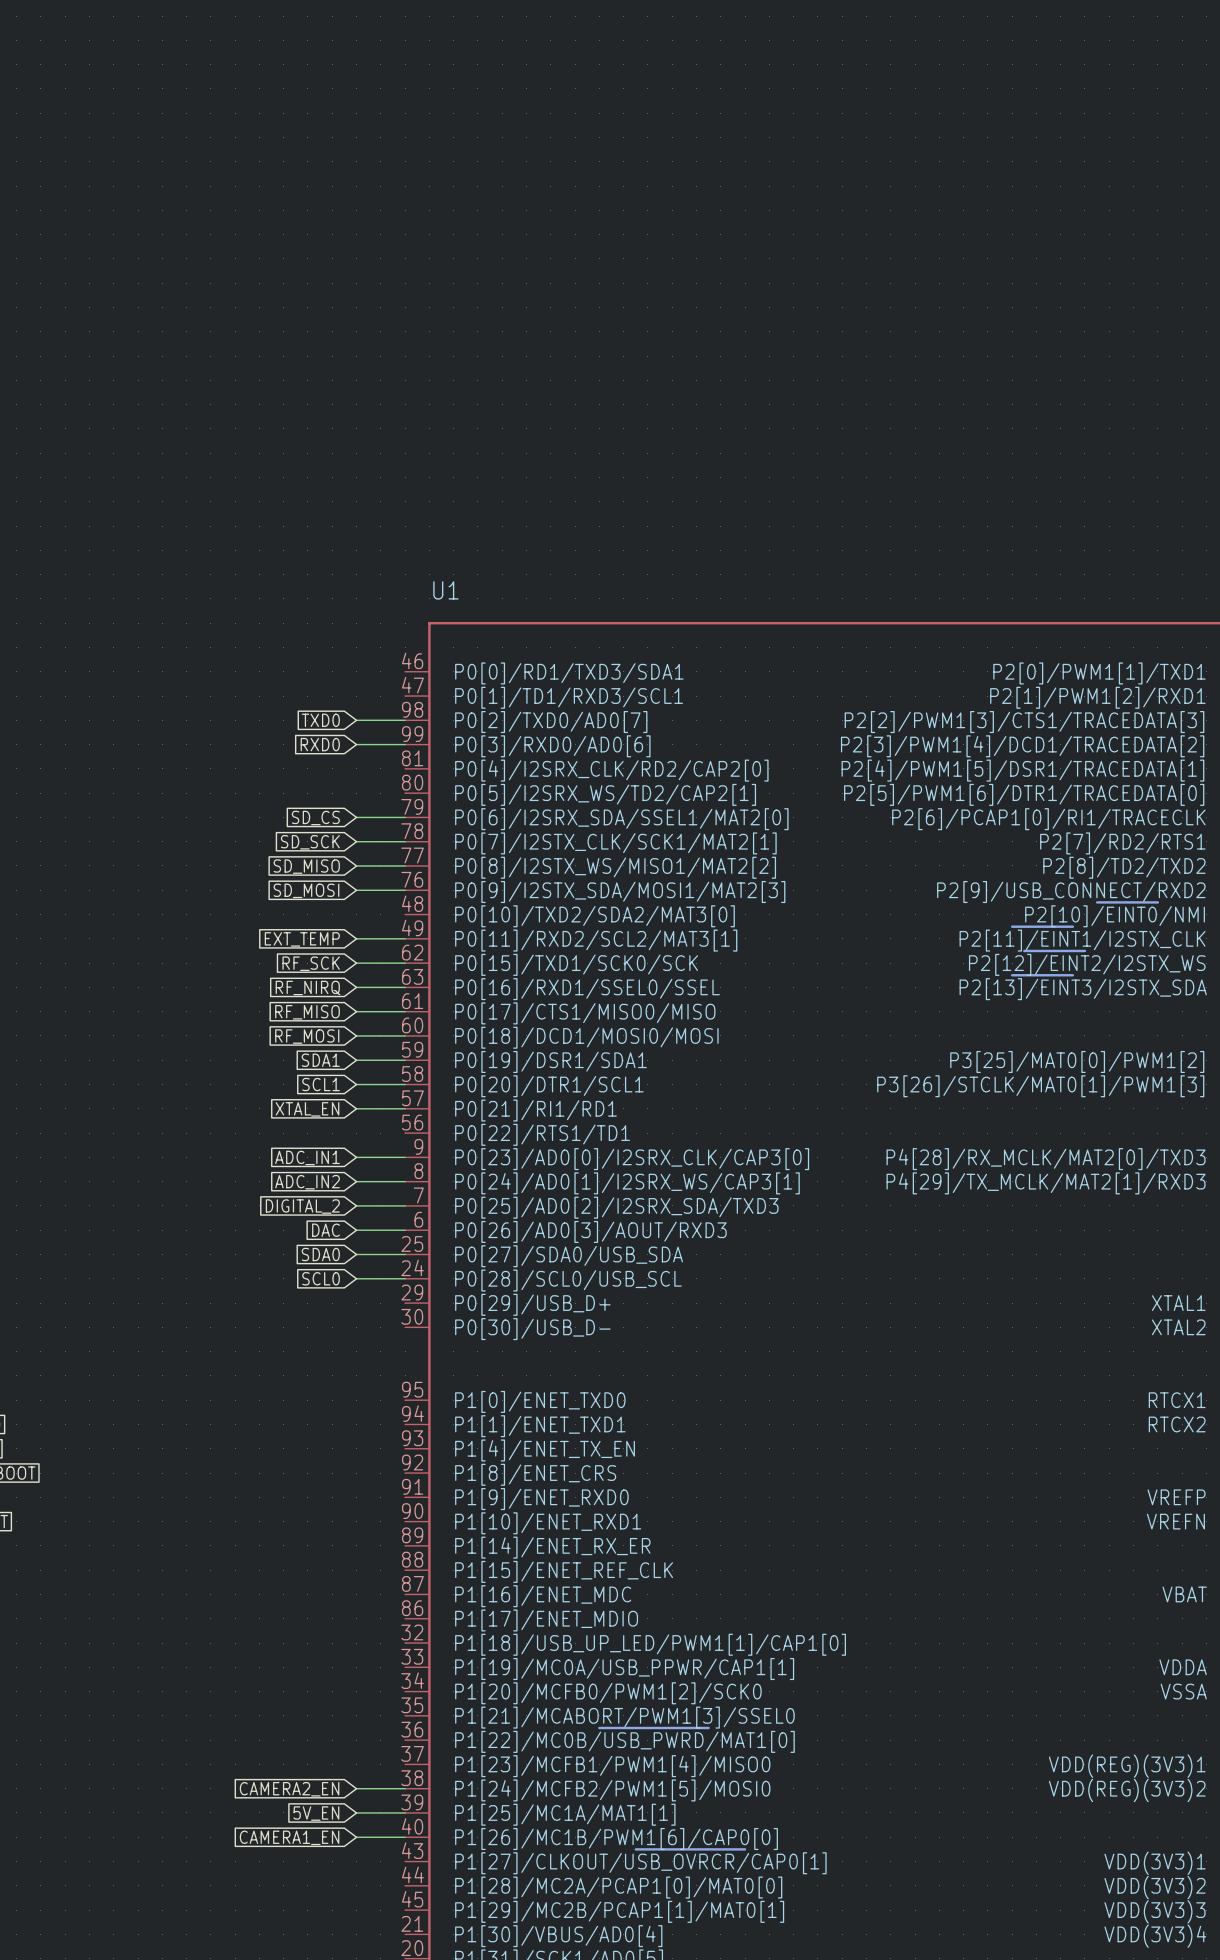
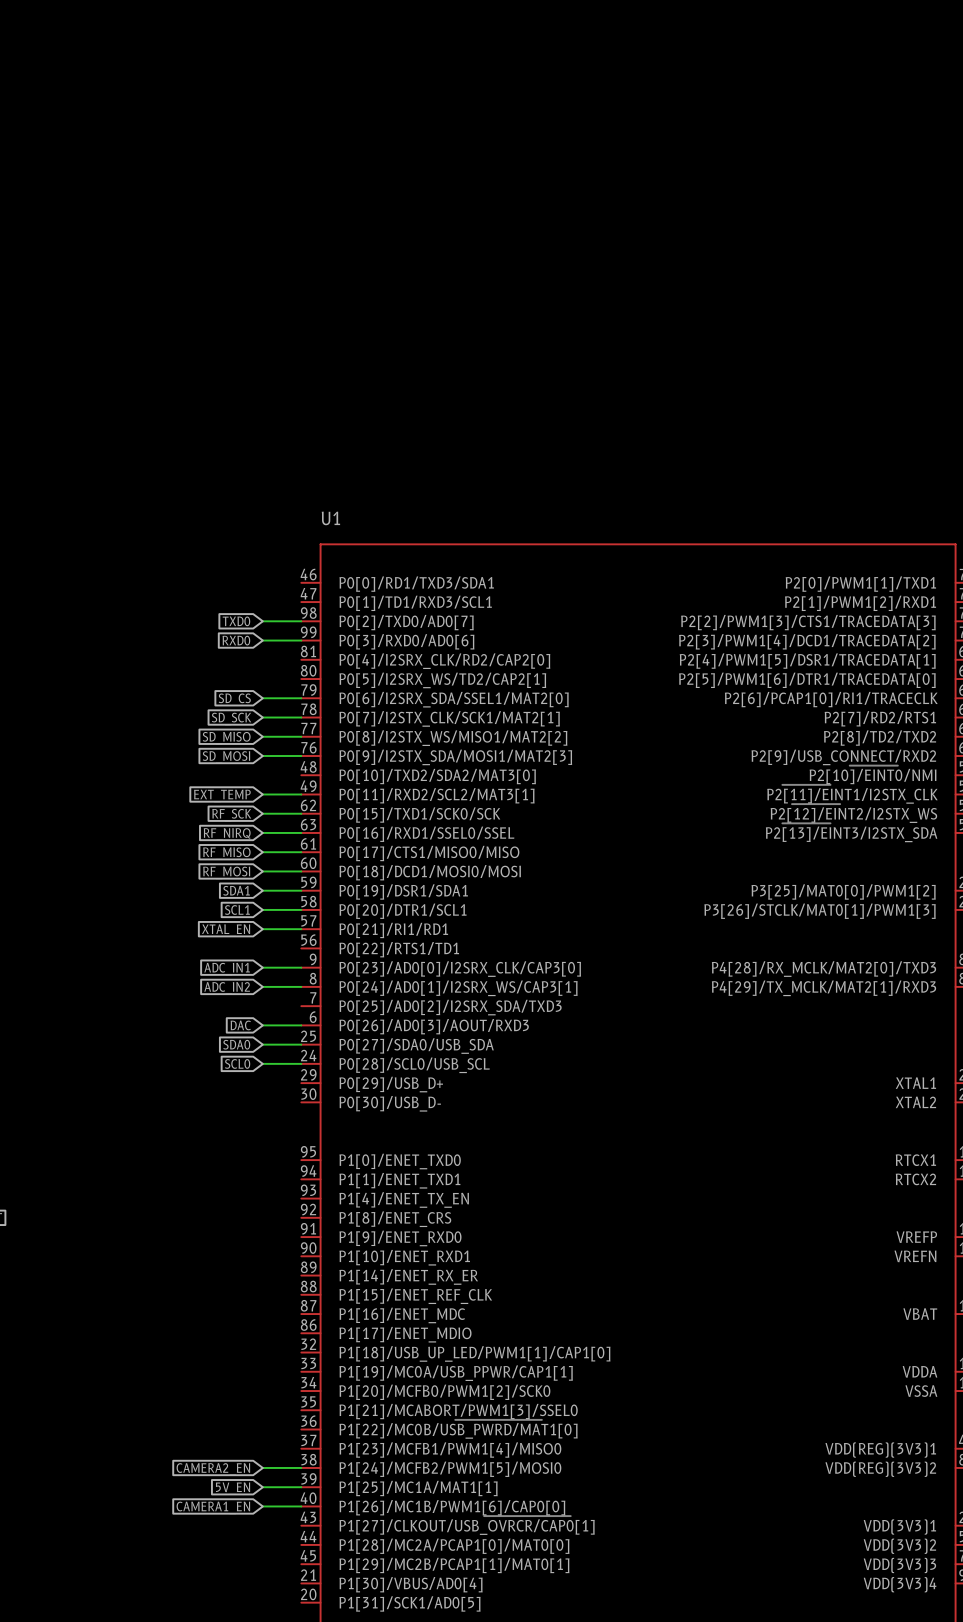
wire: (356, 1205) (405, 1205) -> none
global label: DIGITAL_2 (302, 1206) -> none

